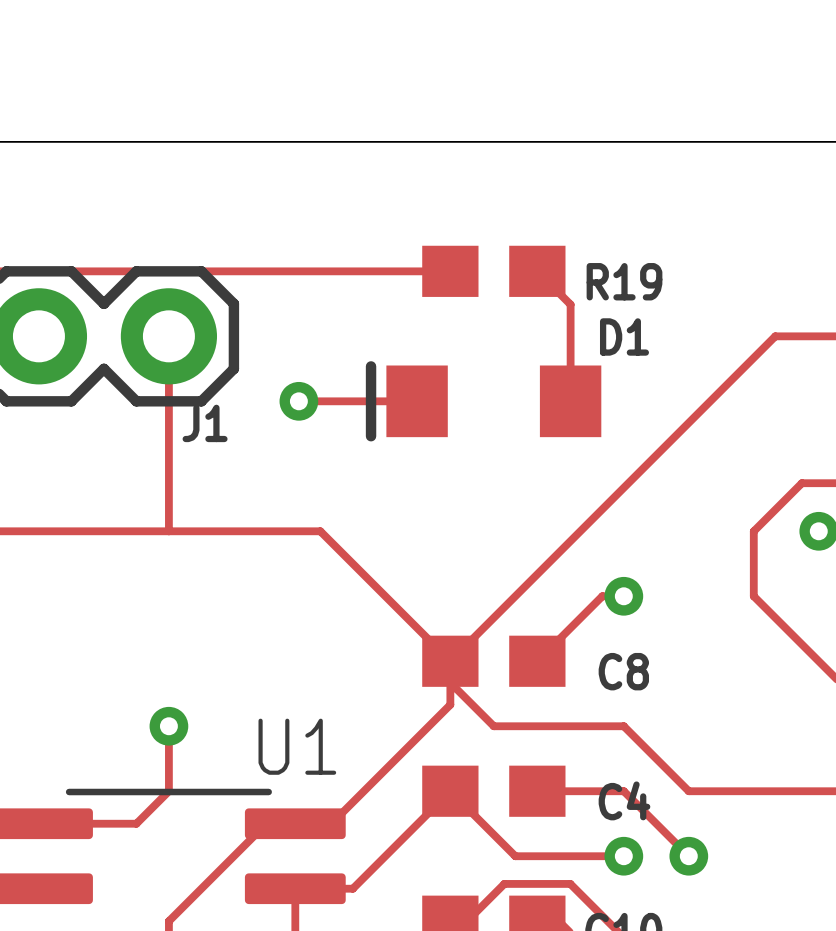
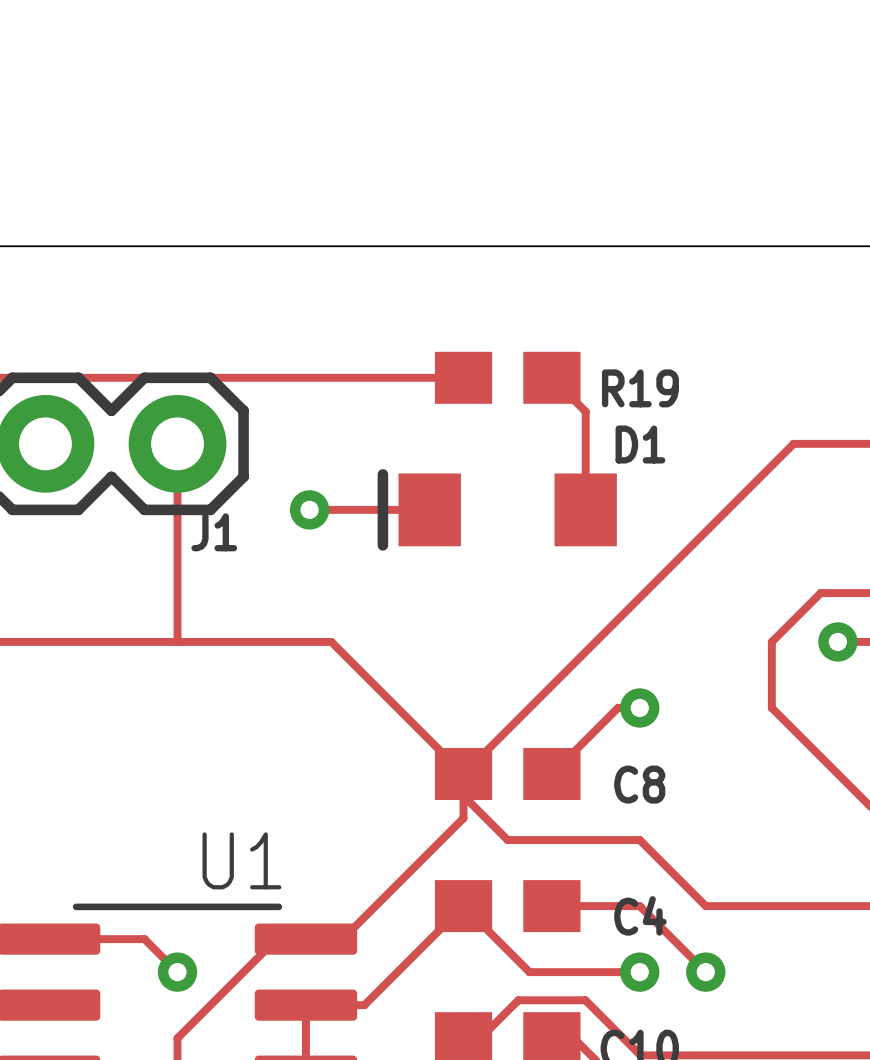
track: (168, 726) (168, 791) (136, 823) -> (177, 972) (144, 939)
via position: (168, 726) -> (177, 972)
U1 name position: U1 (297, 746) -> U1 (241, 860)

